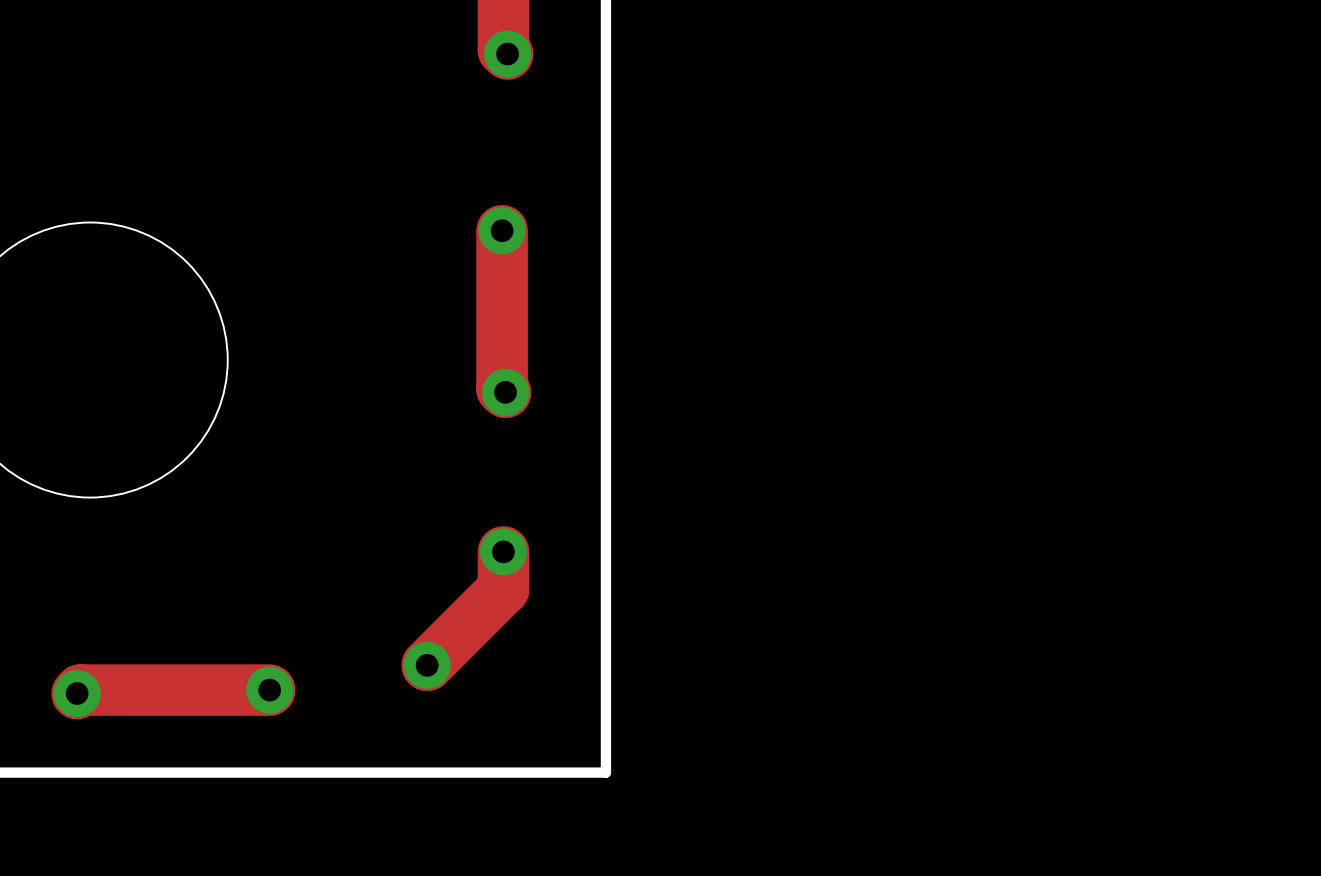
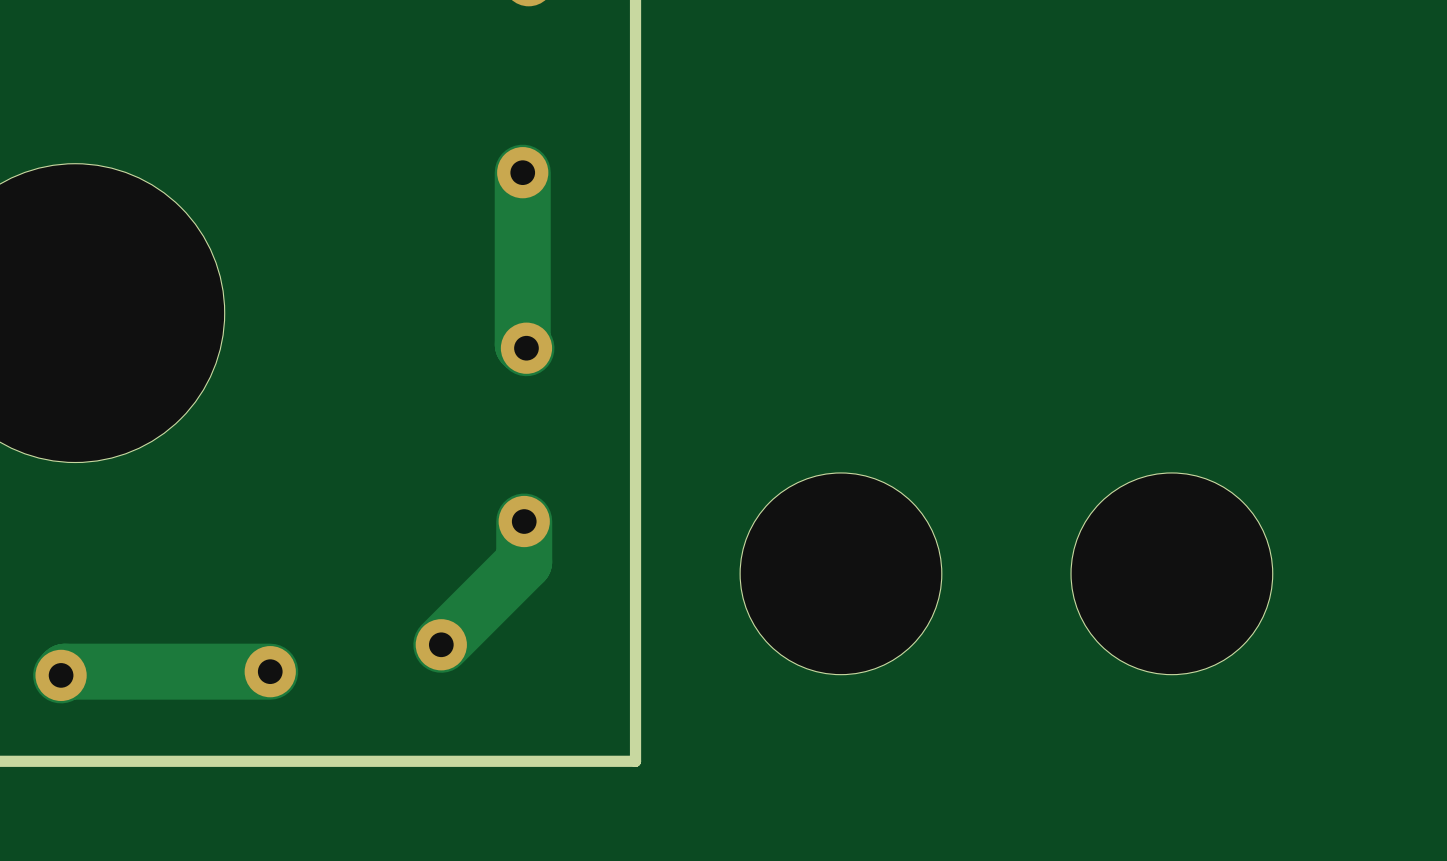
part: none -> (840, 573)
part: none -> (1171, 573)

